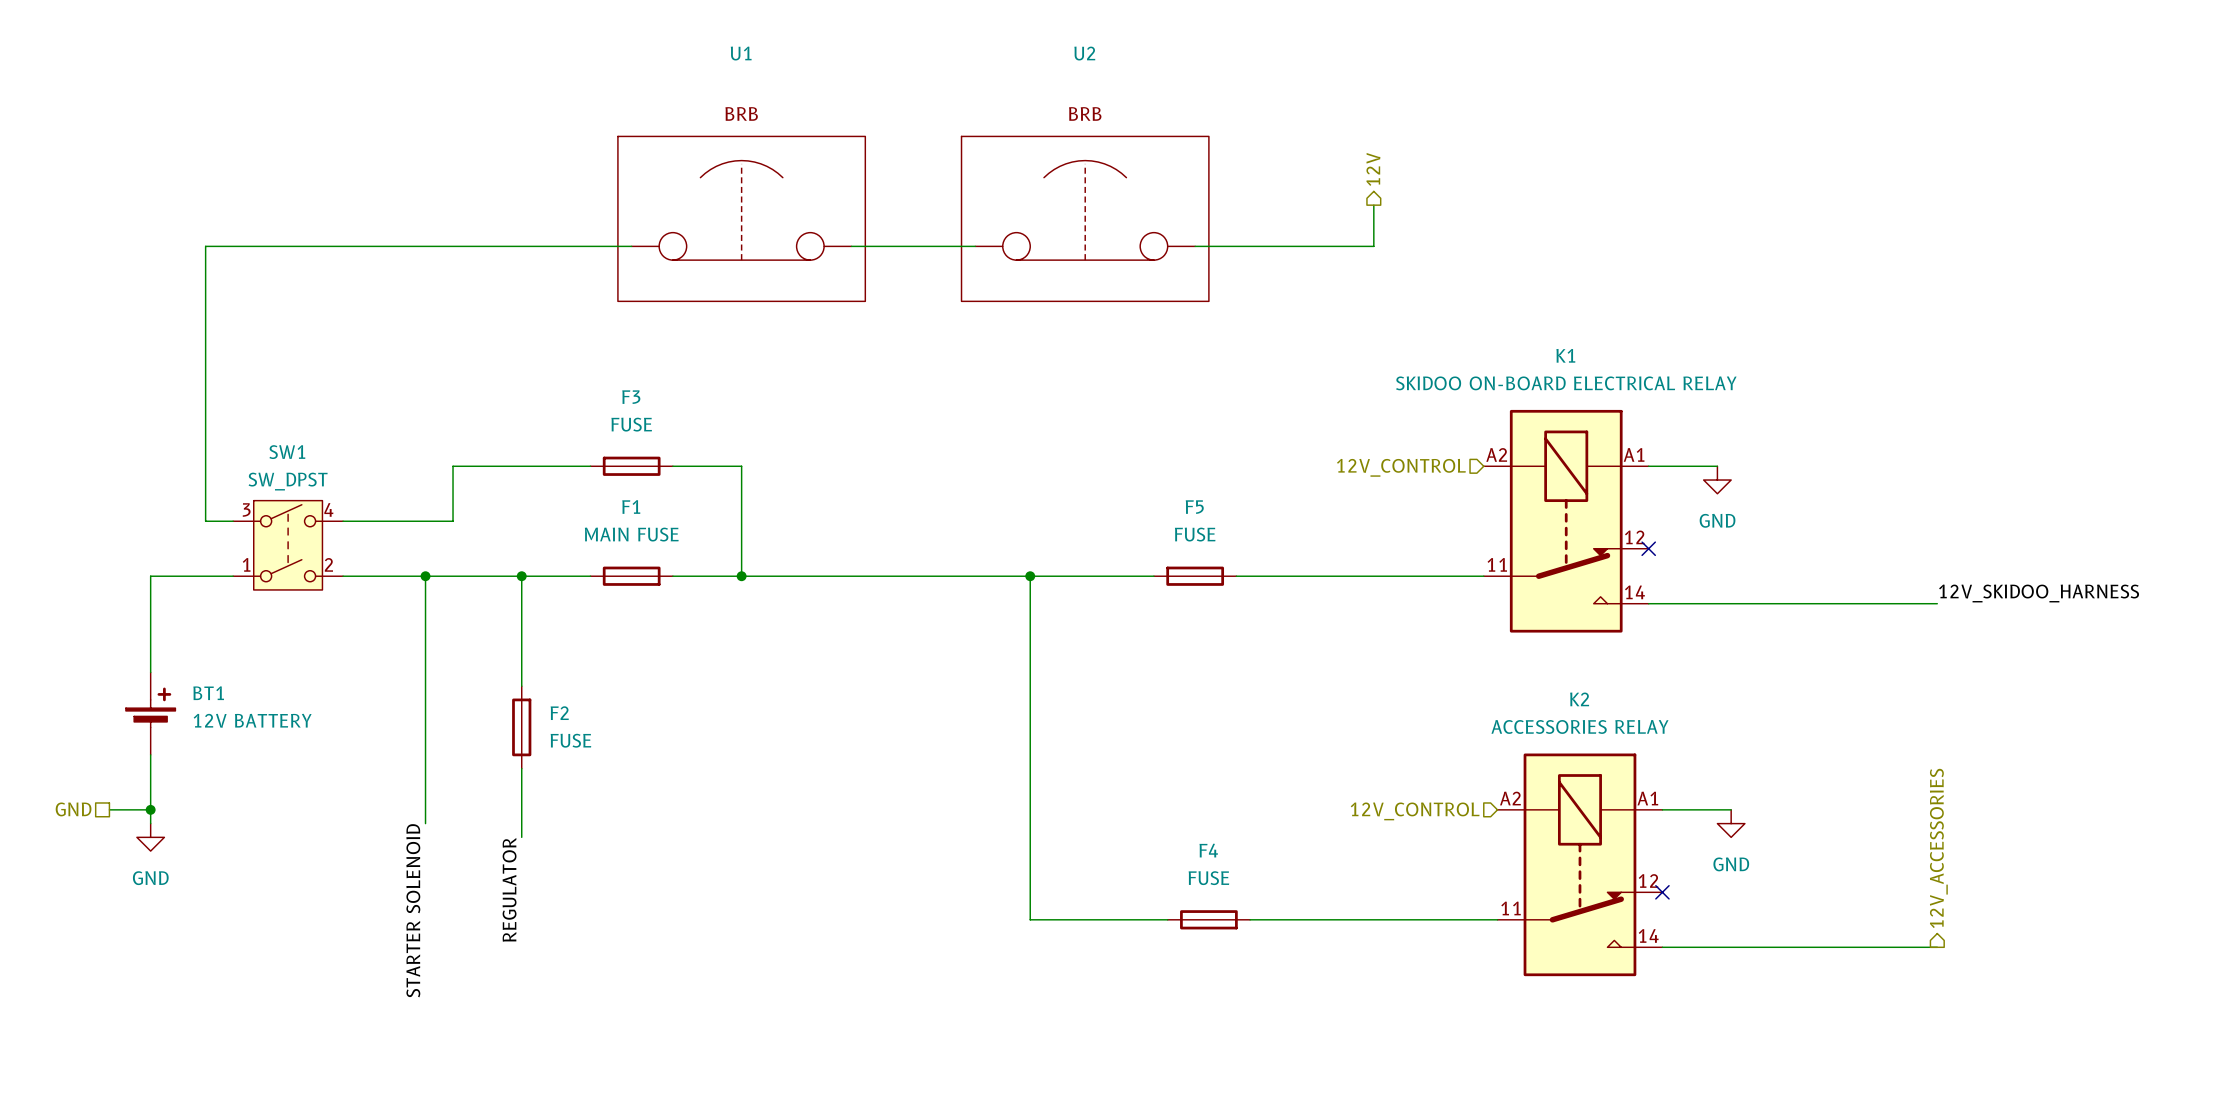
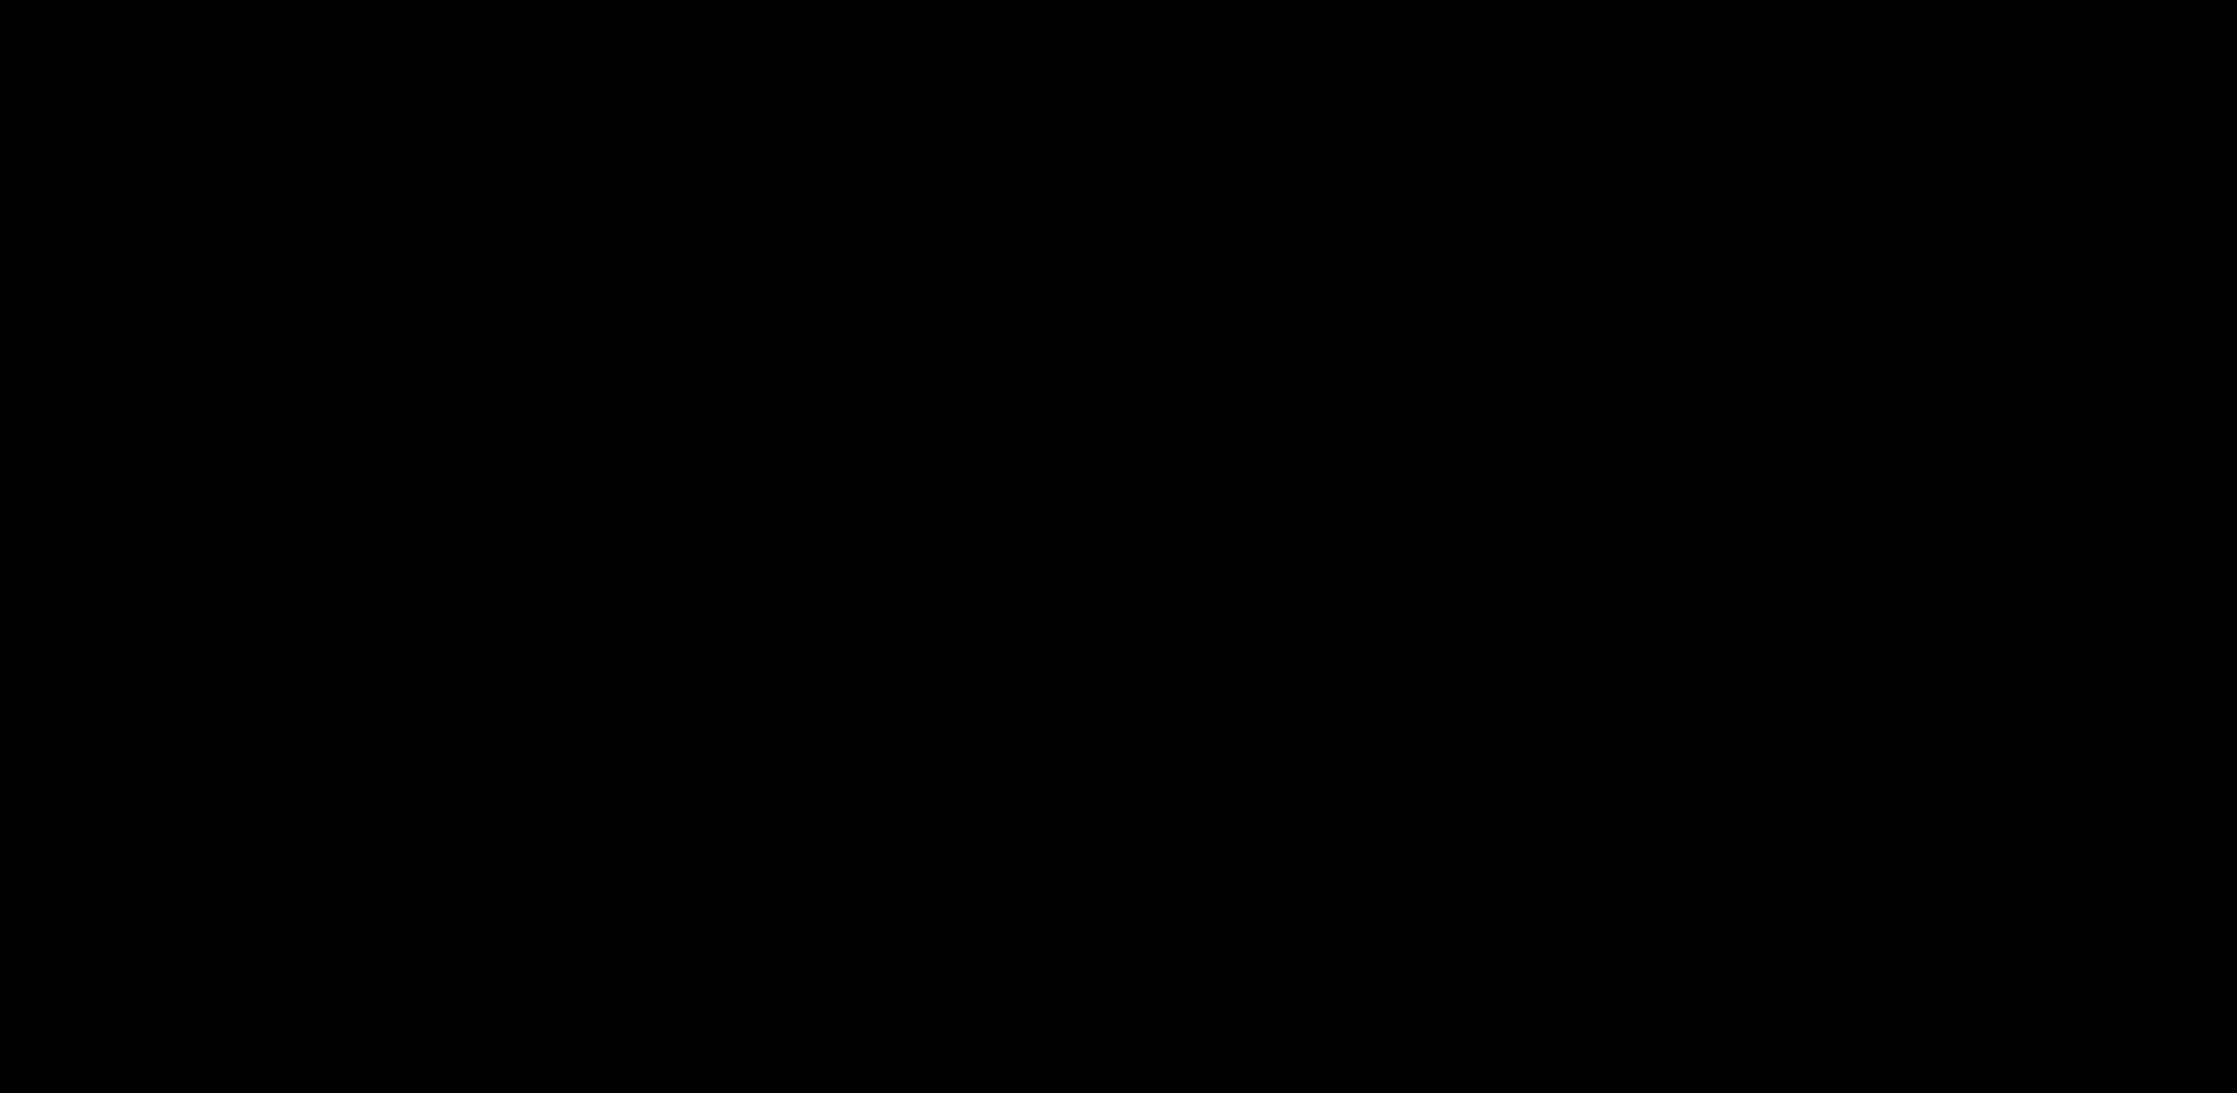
hierarchical label: 12V (1373, 169) -> none
wire: (1373, 205) (1373, 246) (1195, 246) -> none
U1: (741, 218) -> none
U2: (1085, 218) -> none
wire: (631, 246) (205, 246) (205, 521) (233, 521) -> none
wire: (851, 246) (975, 246) -> none
wire: (590, 466) (453, 466) (453, 521) (343, 521) -> none
F3: FUSE (631, 466) -> none
wire: (672, 466) (741, 466) (741, 576) -> none
wire: (1648, 466) (1717, 466) -> none
hierarchical label: 12V_CONTROL (1401, 467) -> none
power symbol: GND (1717, 480) -> none
K1: SKIDOO ON-BOARD ELECTRICAL RELAY (1566, 521) -> none
SW1: SW_DPST (288, 545) -> none
no-connect mark: (1648, 548) -> none
wire: (233, 576) (150, 576) (150, 672) -> none
wire: (343, 576) (590, 576) -> none
wire: (425, 576) (425, 823) -> none
junction: (425, 576) -> none
wire: (521, 576) (521, 686) -> none
junction: (521, 576) -> none
F1: MAIN FUSE (631, 576) -> none
wire: (672, 576) (1153, 576) -> none
junction: (741, 576) -> none
wire: (1030, 576) (1030, 919) (1167, 919) -> none
junction: (1030, 576) -> none
F5: FUSE (1195, 576) -> none
wire: (1236, 576) (1483, 576) -> none
label: 12V_SKIDOO_HARNESS (2039, 593) -> none
wire: (1648, 603) (1937, 603) -> none
BT1: 12V BATTERY (150, 713) -> none
F2: FUSE (521, 727) -> none
wire: (150, 754) (150, 823) -> none
wire: (521, 768) (521, 837) -> none
hierarchical label: GND (73, 809) -> none
wire: (109, 809) (150, 809) -> none
junction: (150, 809) -> none
wire: (1662, 809) (1731, 809) -> none
hierarchical label: 12V_CONTROL (1415, 811) -> none
power symbol: GND (1731, 823) -> none
power symbol: GND (150, 837) -> none
hierarchical label: 12V_ACCESSORIES (1938, 848) -> none
K2: ACCESSORIES RELAY (1579, 864) -> none
label: REGULATOR (509, 889) -> none
no-connect mark: (1662, 892) -> none
label: STARTER SOLENOID (413, 910) -> none
F4: FUSE (1208, 919) -> none
wire: (1250, 919) (1497, 919) -> none
wire: (1662, 947) (1937, 947) -> none

